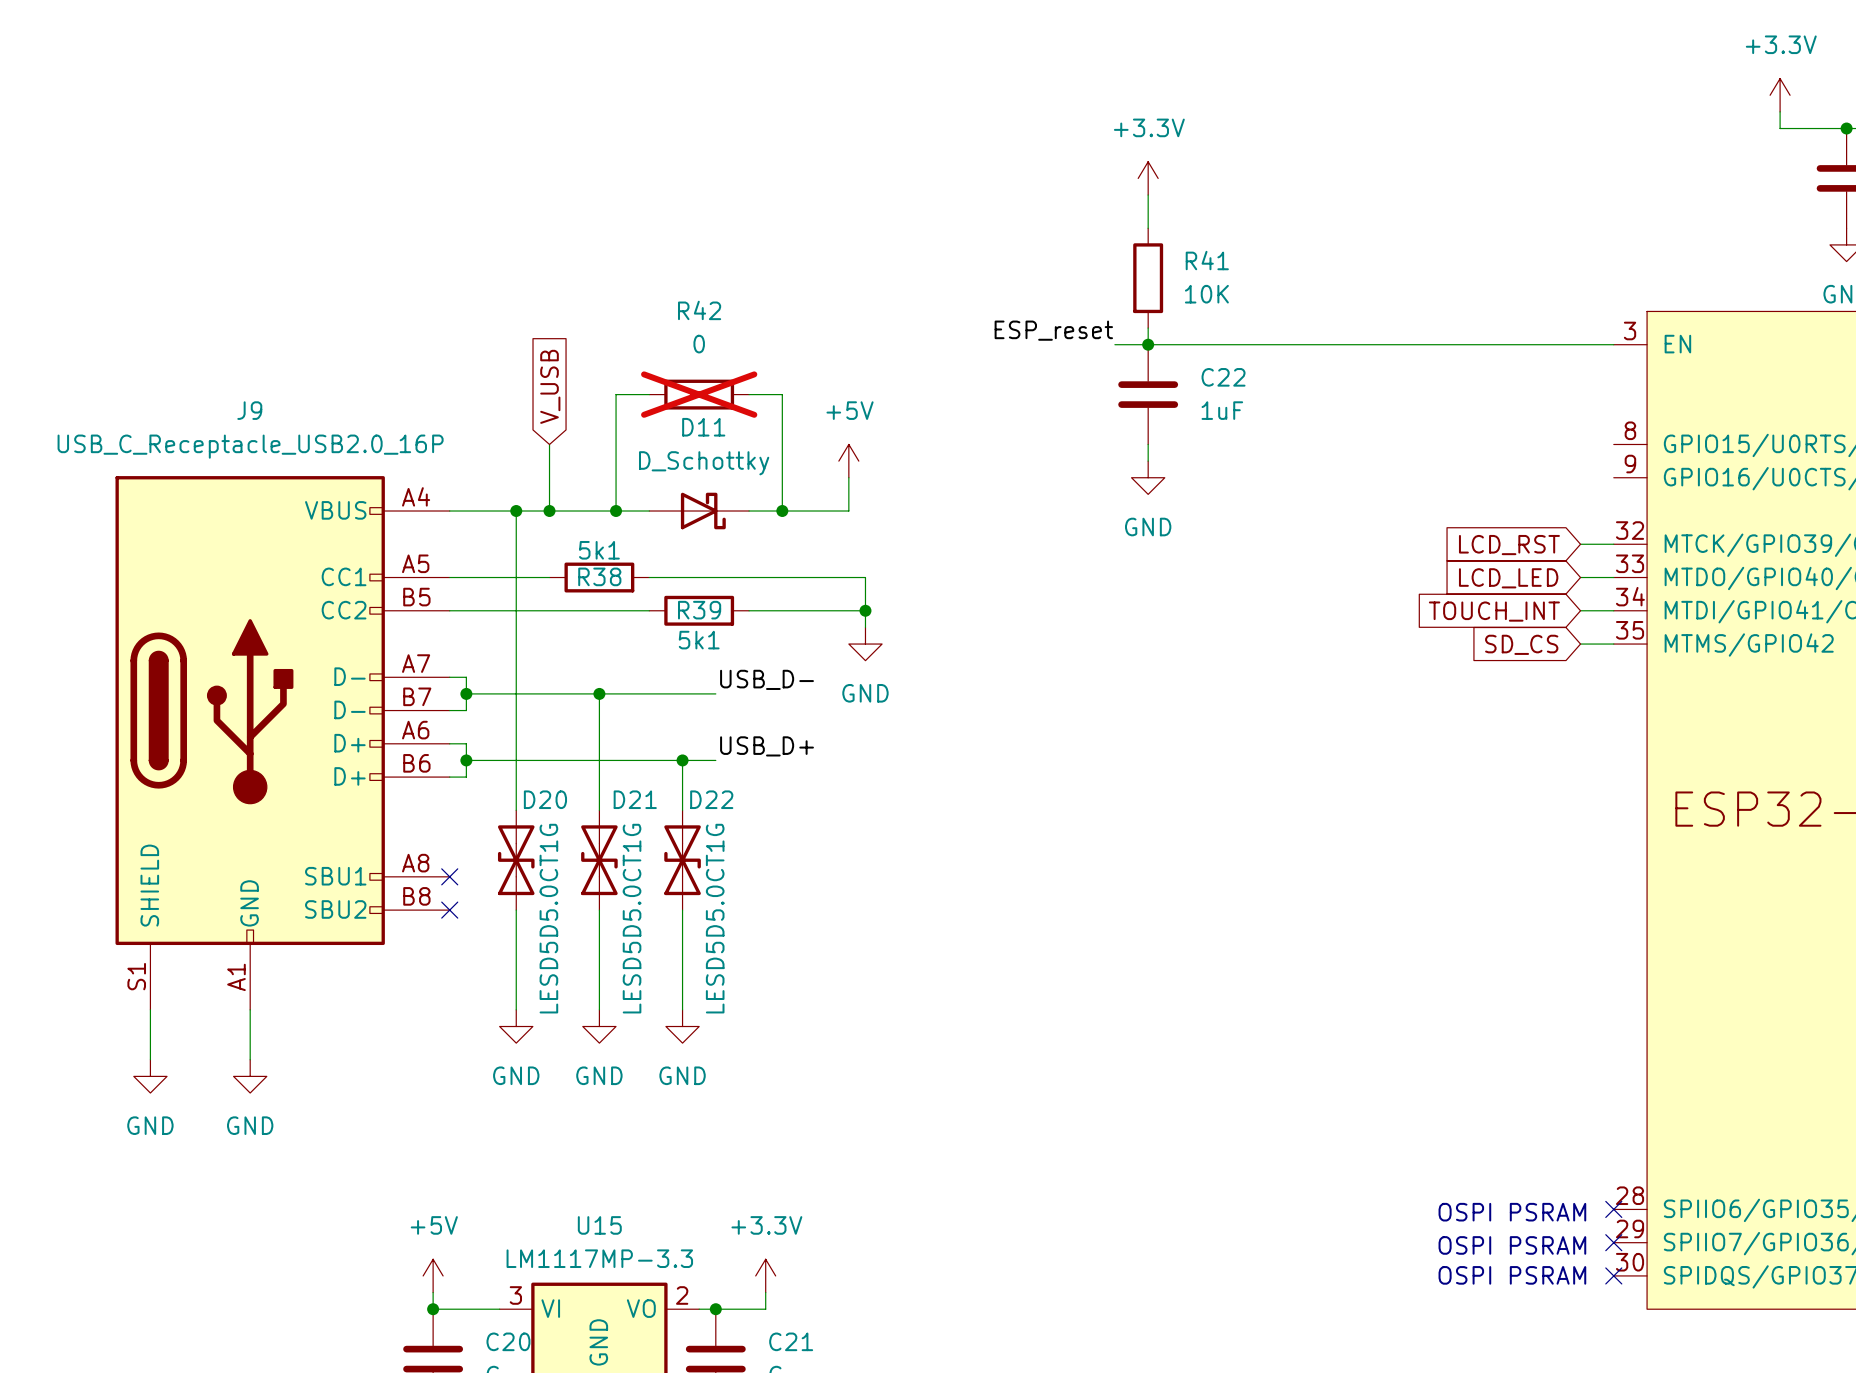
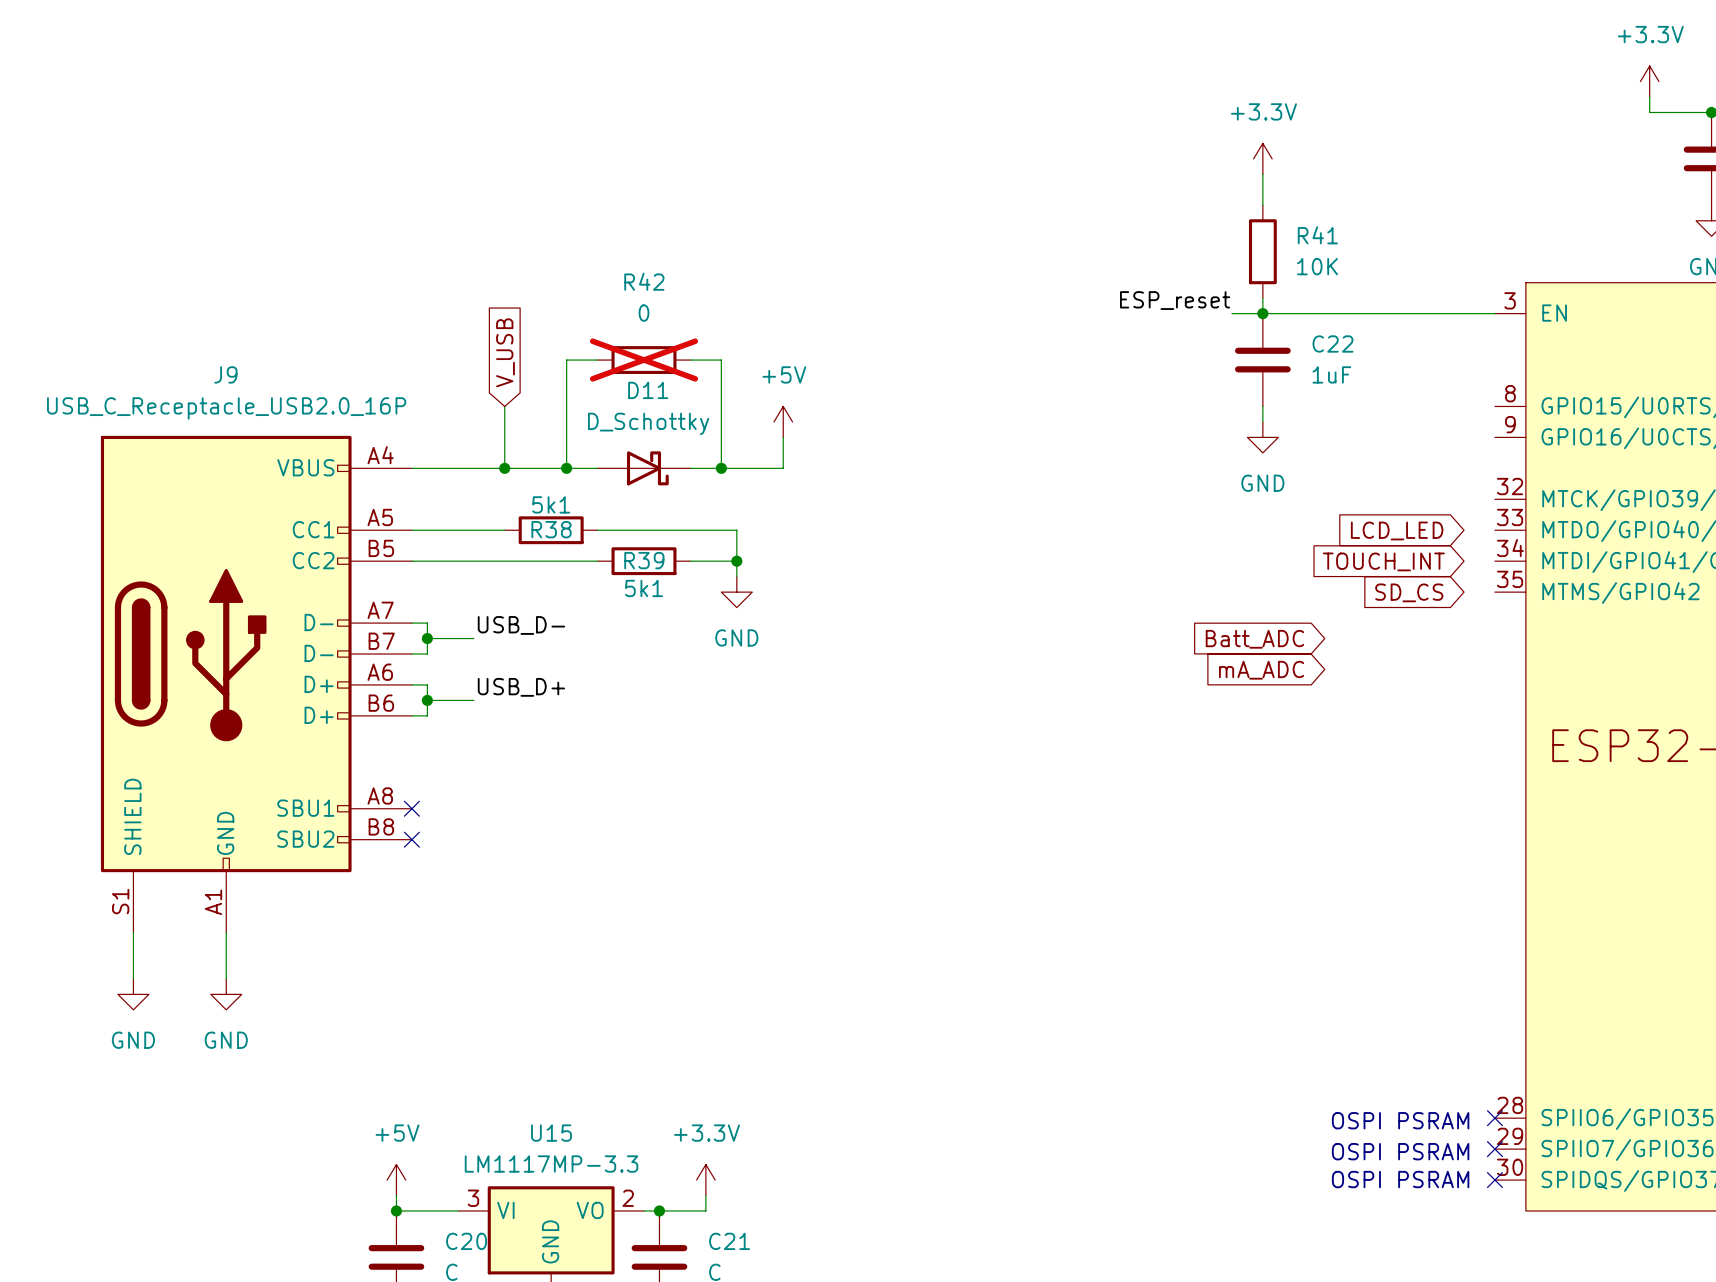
power symbol position: +3.3V (1148, 178) -> +3.3V (1262, 158)
wire: (1148, 195) (1148, 228) -> (1262, 174) (1262, 205)
R41 position: (1148, 278) -> (1262, 251)
wire: (1148, 328) (1148, 344) -> (1262, 298) (1262, 313)
label position: ESP_reset (1053, 330) -> ESP_reset (1175, 300)
wire: (1114, 344) (1331, 344) -> none
junction: (1148, 344) -> none
junction: none -> (1262, 313)
C22 position: (1148, 394) -> (1262, 360)
wire: (1148, 444) (1148, 461) -> (1262, 406) (1262, 421)
power symbol: GND (1148, 477) -> none
power symbol: none -> GND (1262, 437)
wire: (516, 511) (516, 810) -> none
junction: (516, 511) -> none
wire: (1580, 544) (1613, 544) -> none
global label: LCD_RST (1509, 545) -> none
wire: (798, 577) (865, 577) (865, 627) -> (736, 530) (736, 576)
wire: (1580, 577) (1613, 577) -> none
wire: (798, 610) (865, 610) -> none
junction position: (865, 610) -> (736, 561)
wire: (1580, 610) (1613, 610) -> none
power symbol position: GND (865, 644) -> GND (736, 592)
wire: (1580, 644) (1613, 644) -> none
label position: USB_D- (767, 679) -> USB_D- (521, 625)
wire: (516, 693) (715, 693) -> none
wire: (599, 693) (599, 810) -> none
junction: (599, 693) -> none
global label: none -> Batt_ADC (1254, 639)
global label: none -> mA_ADC (1261, 670)
label position: USB_D+ (767, 746) -> USB_D+ (521, 687)
wire: (516, 760) (715, 760) -> none
wire: (682, 760) (682, 810) -> none
junction: (682, 760) -> none
D20: LESD5D5.0CT1G (516, 860) -> none
D21: LESD5D5.0CT1G (599, 860) -> none
D22: LESD5D5.0CT1G (682, 860) -> none
wire: (516, 910) (516, 1009) -> none
wire: (599, 910) (599, 1009) -> none
wire: (682, 910) (682, 1009) -> none
power symbol: GND (516, 1026) -> none
power symbol: GND (599, 1026) -> none
power symbol: GND (682, 1026) -> none

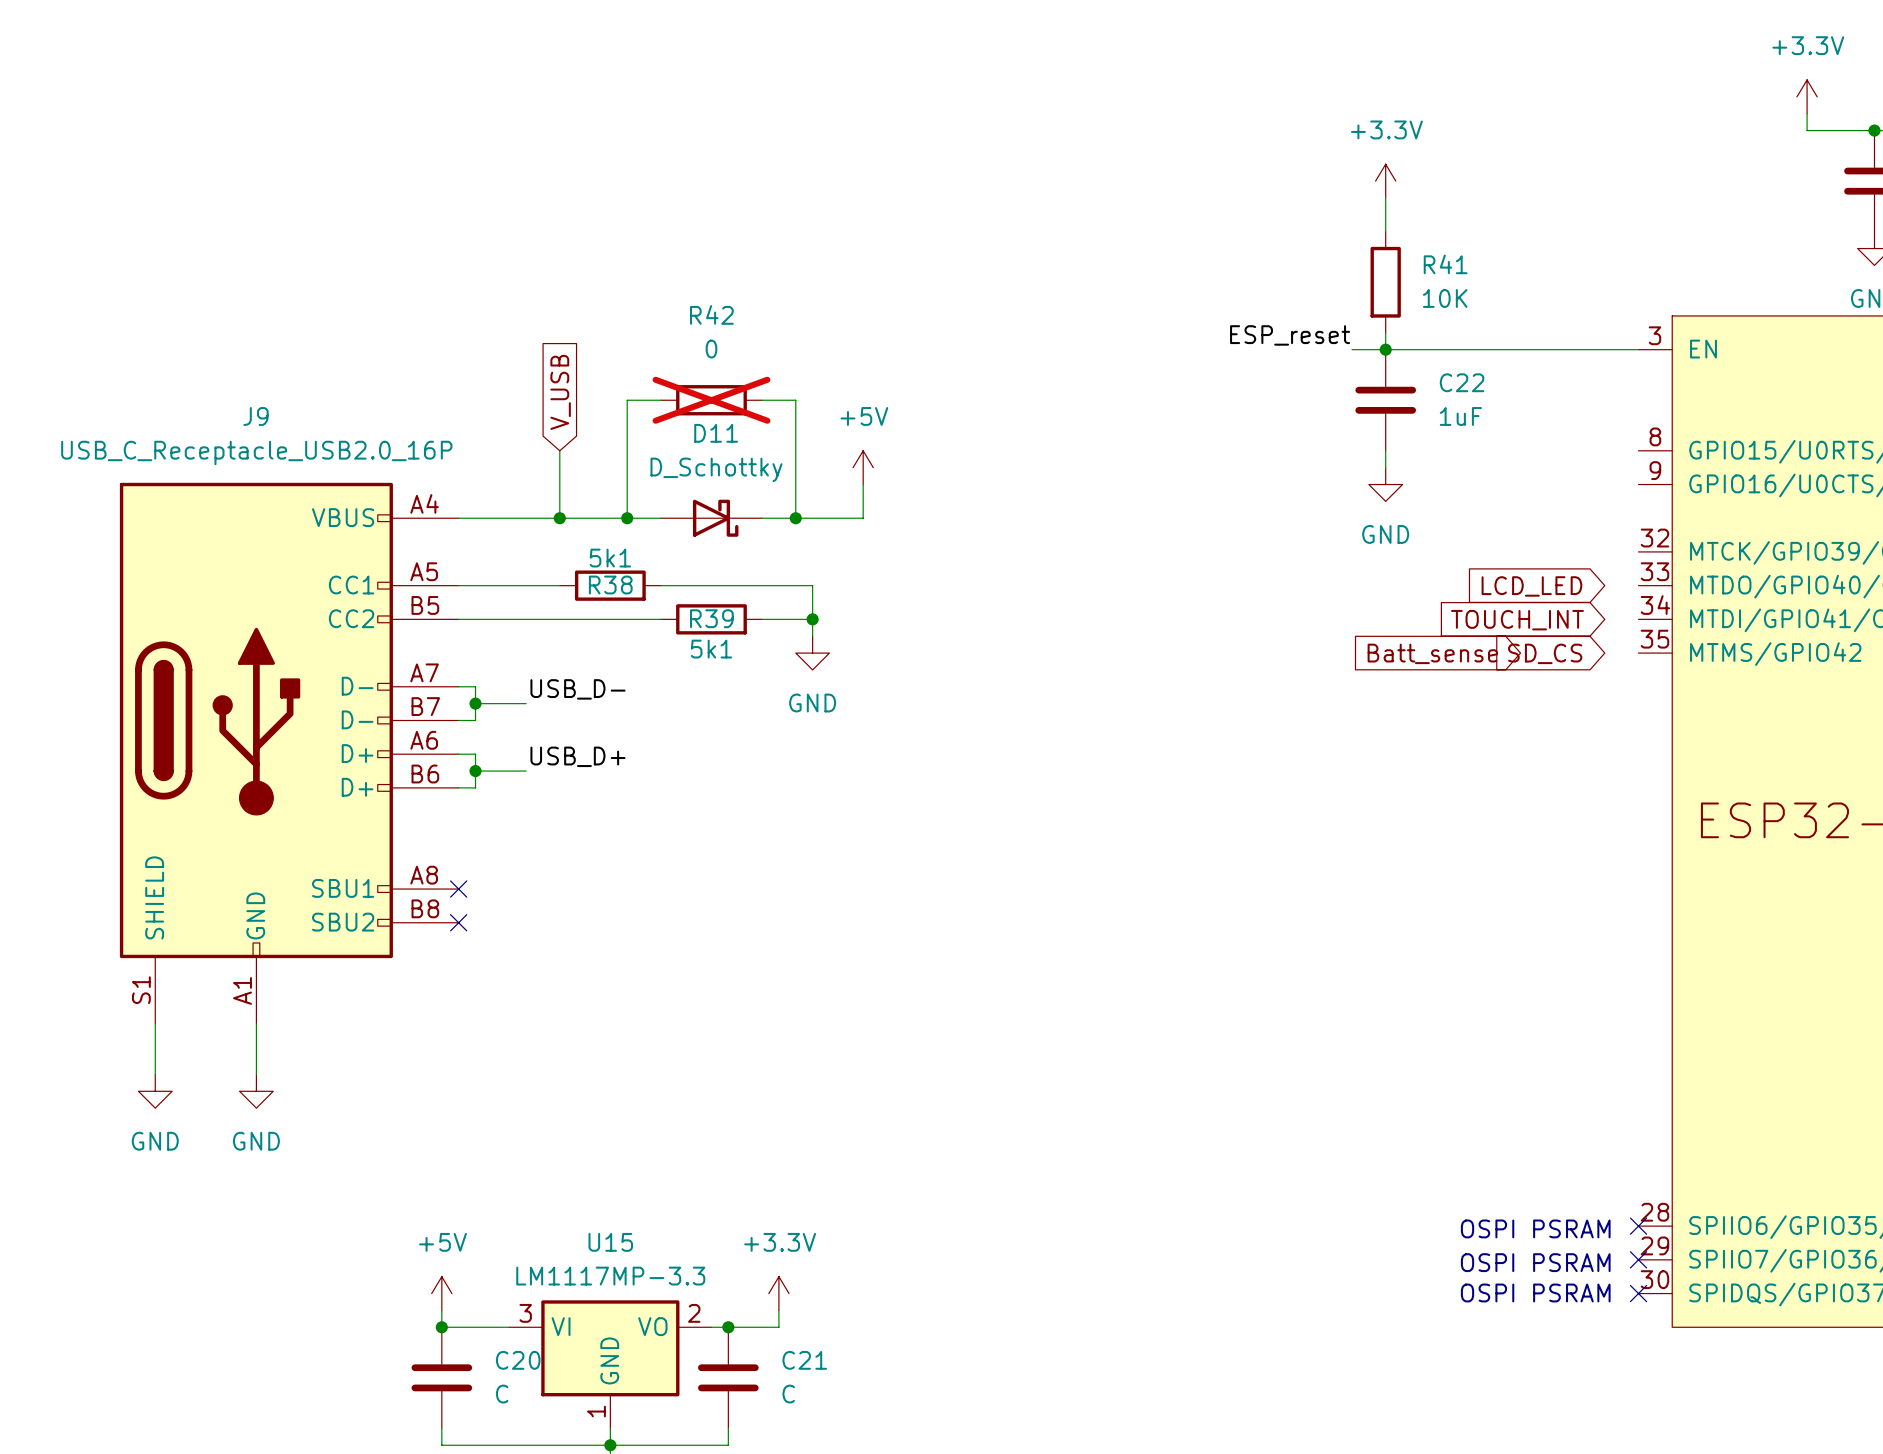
global label: none -> Batt_sense (1432, 653)
global label: Batt_ADC (1254, 639) -> none
global label: mA_ADC (1261, 670) -> none

